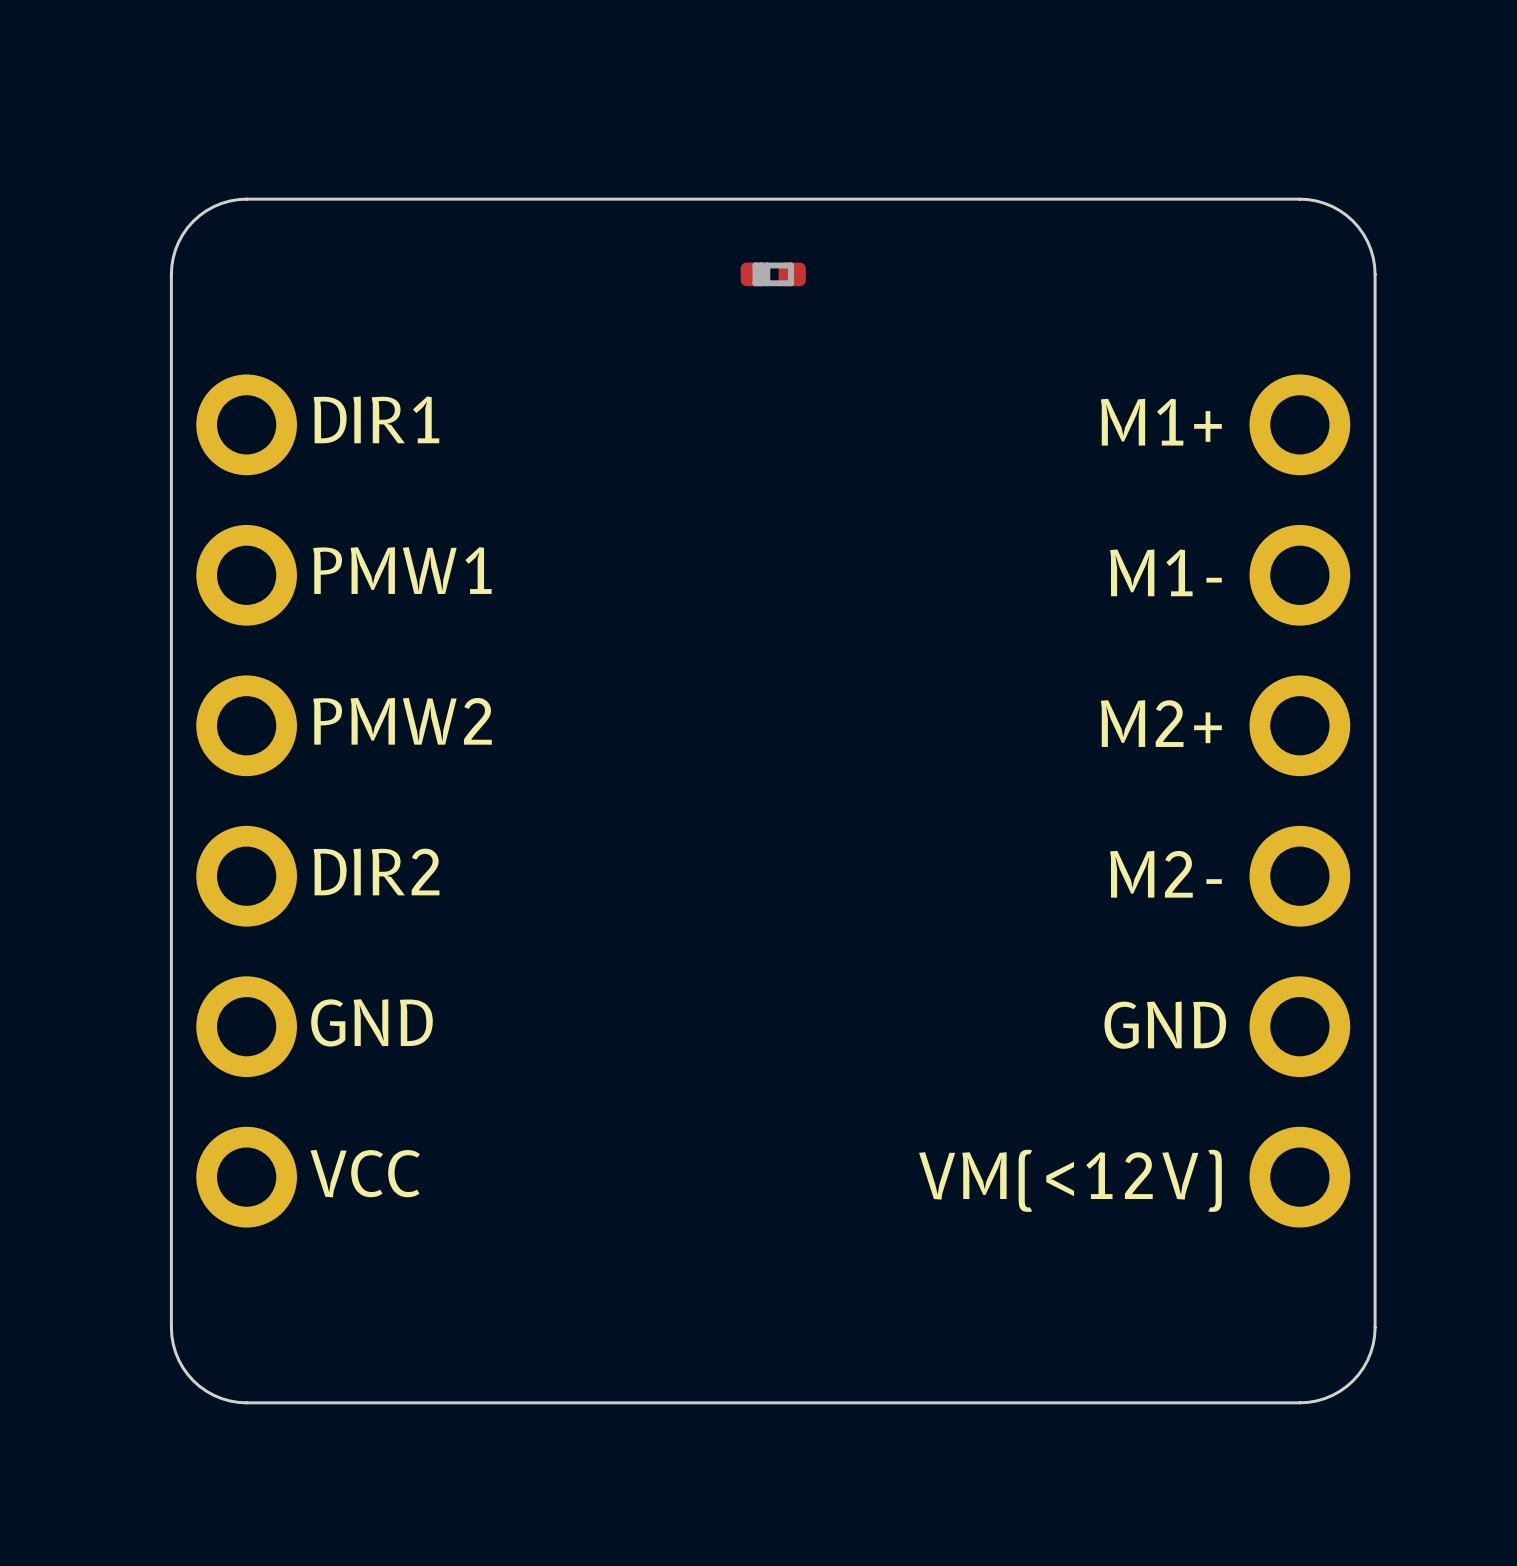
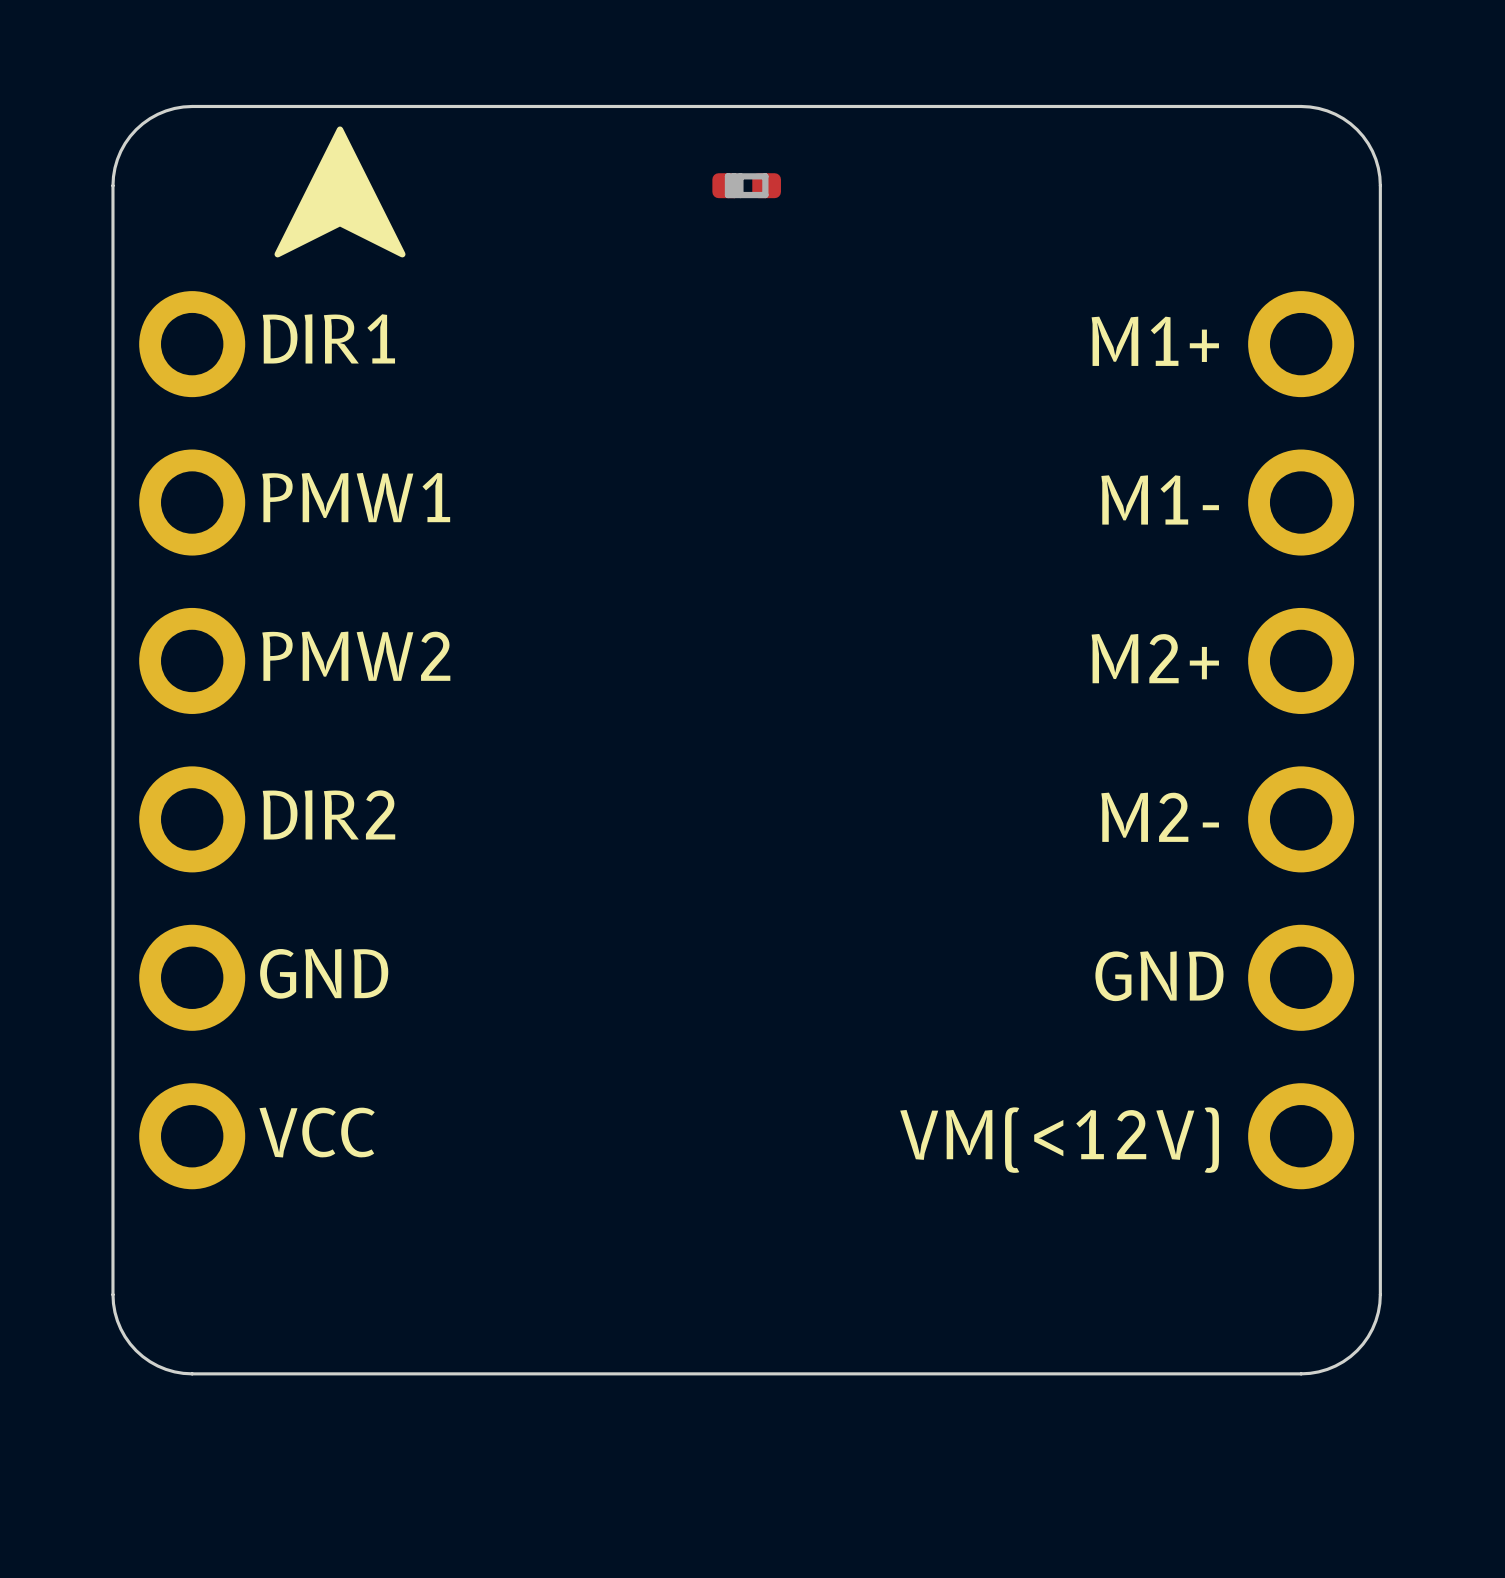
drawing: none -> [274, 126, 406, 258]

